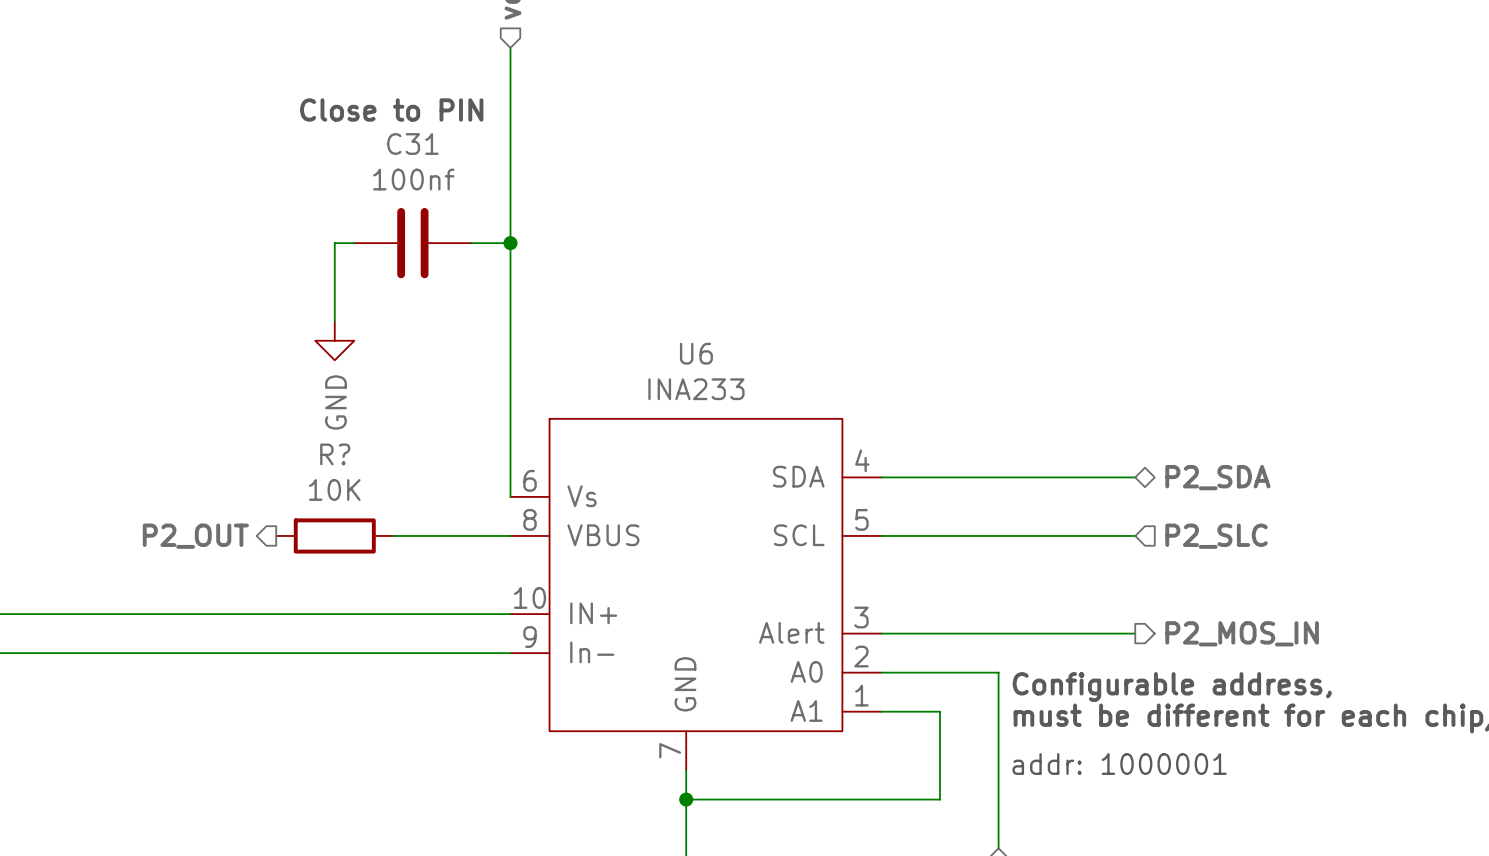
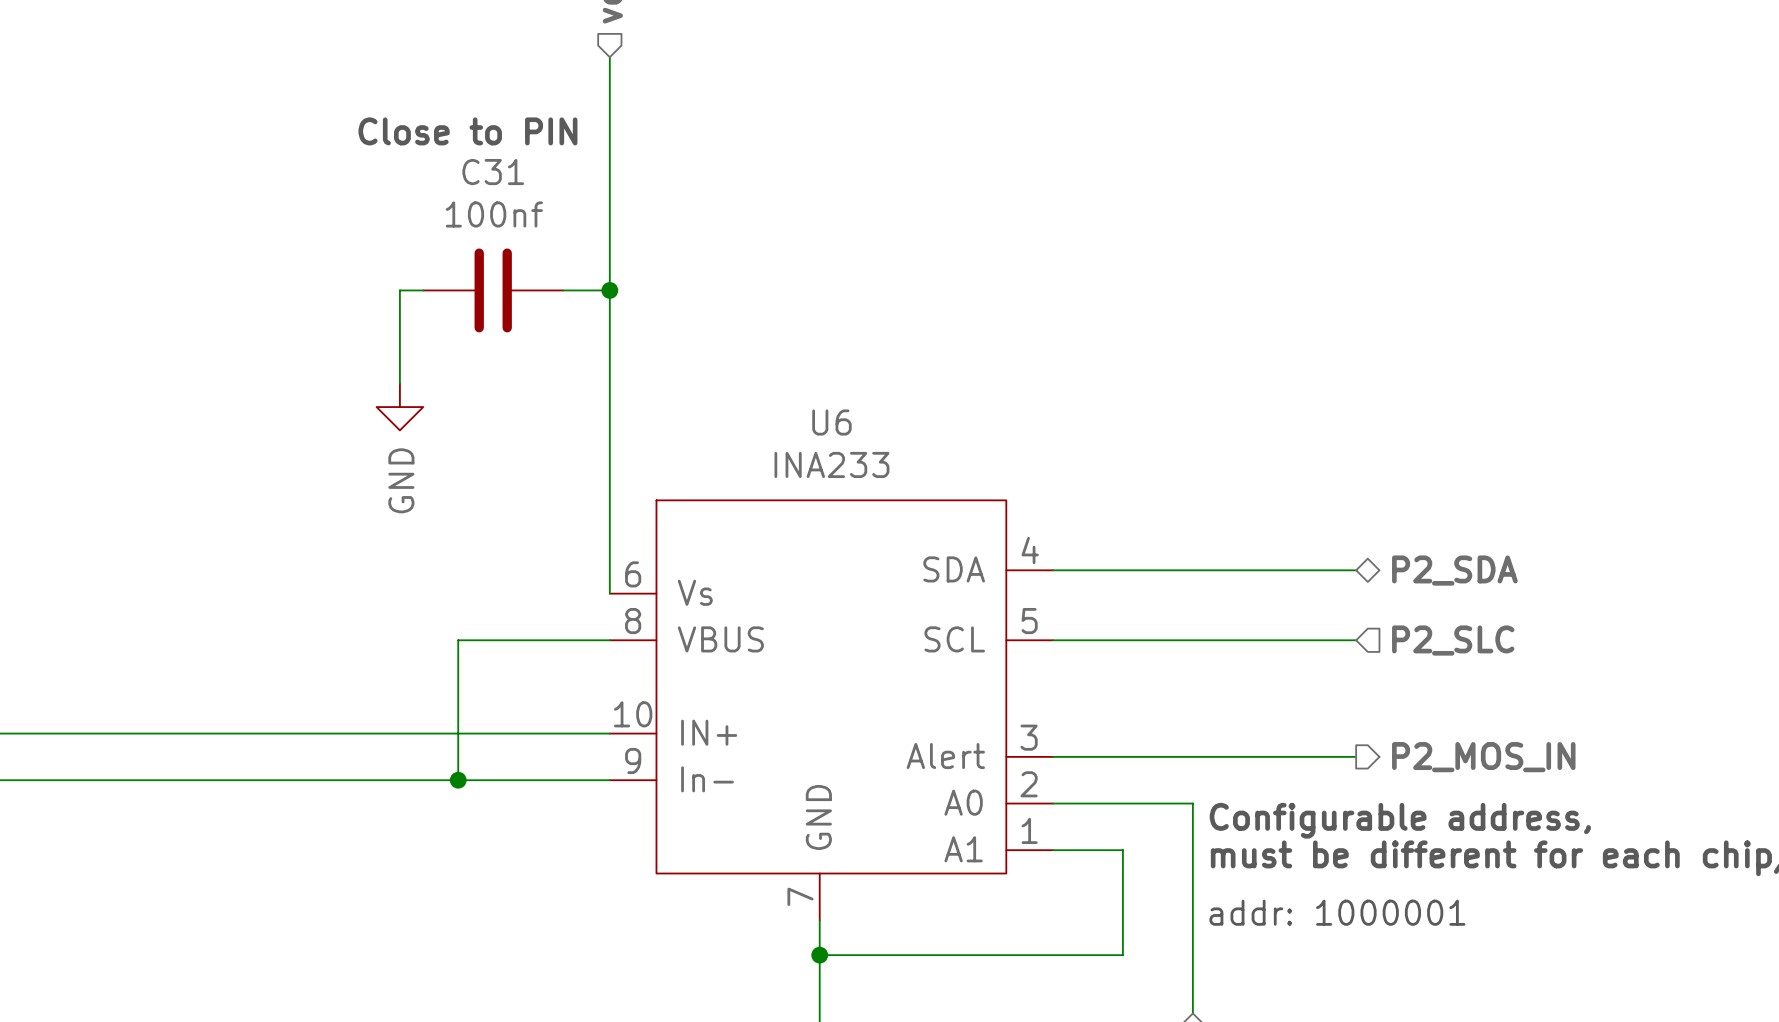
R?: 10K (334, 535) -> none
wire: none -> (469, 640) (458, 640) (458, 780)
hierarchical label: P2_OUT (195, 536) -> none
junction: none -> (458, 780)

